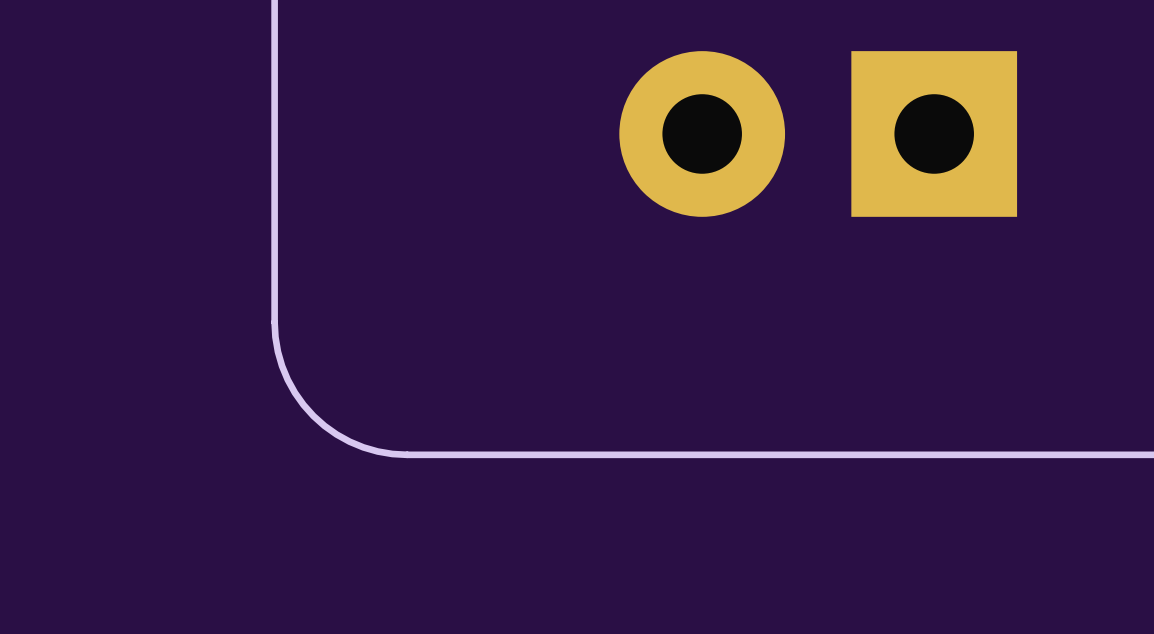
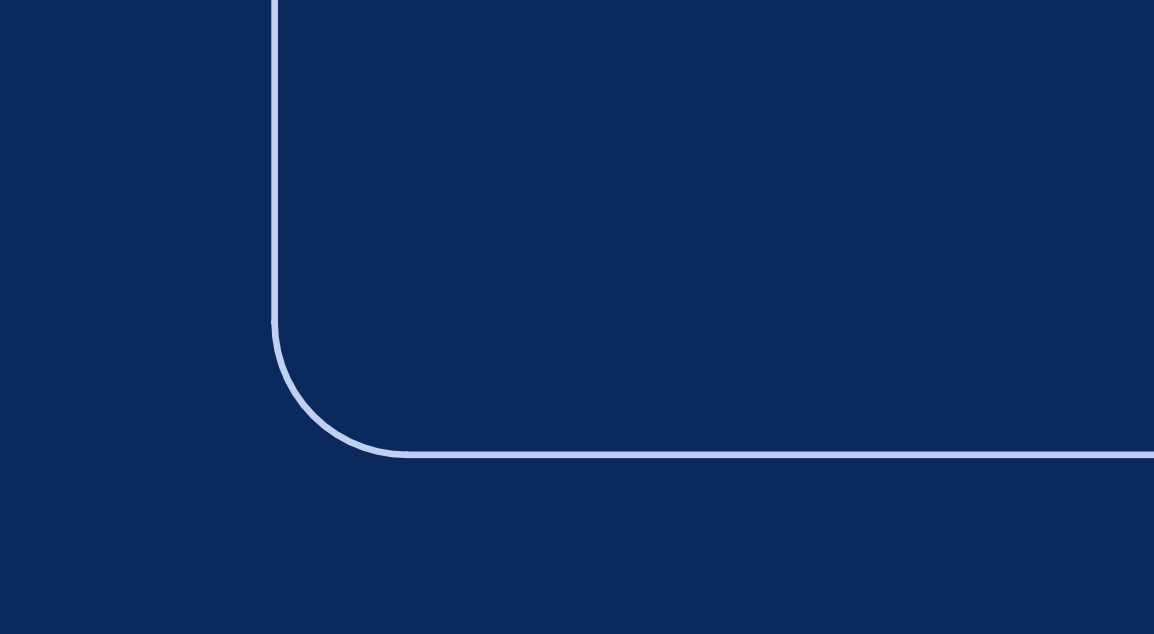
part: (818, 133) -> none

